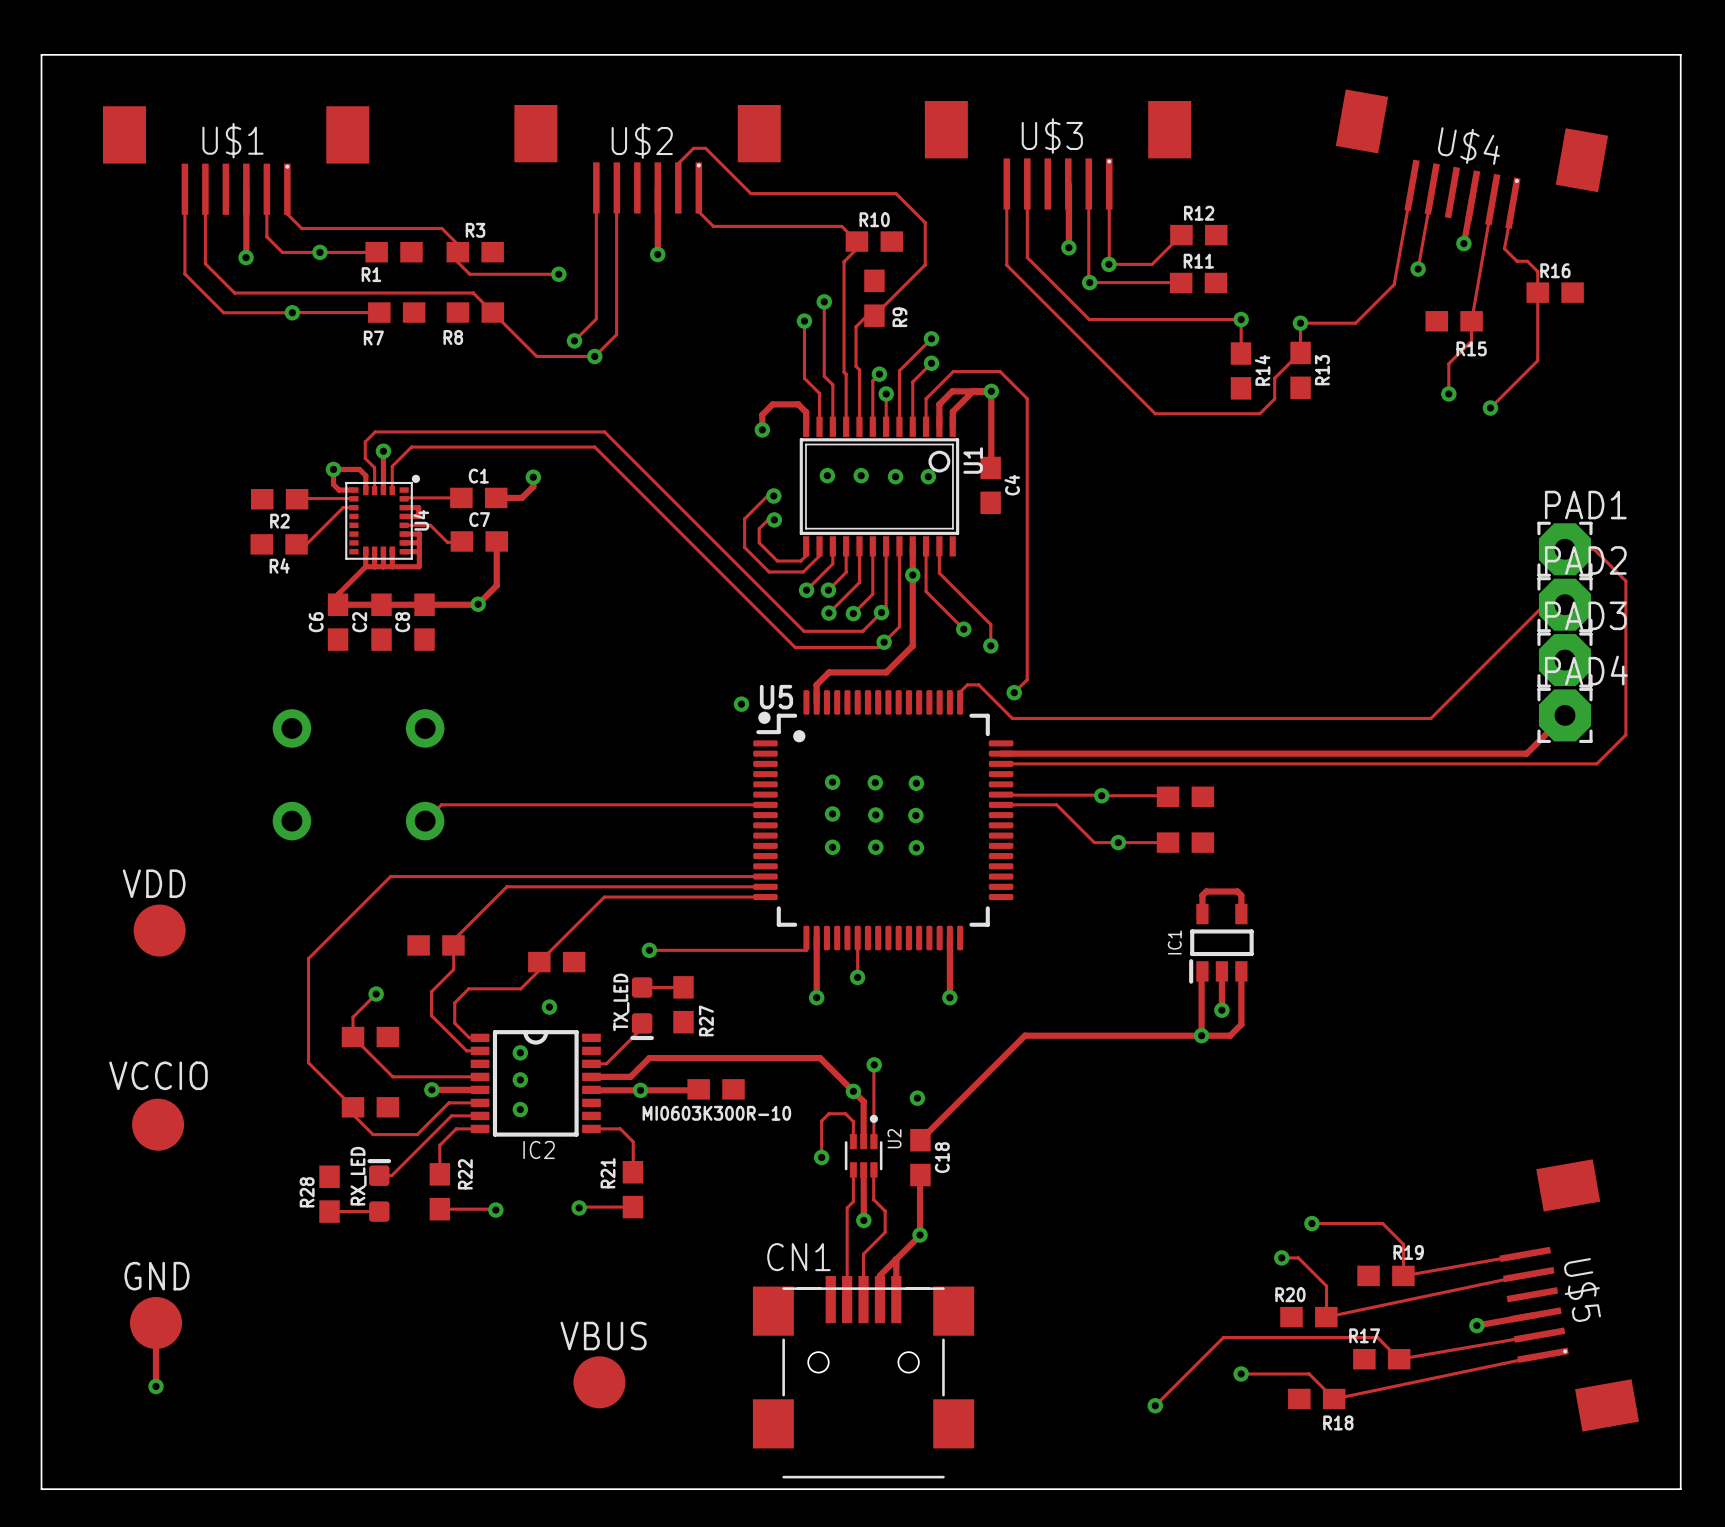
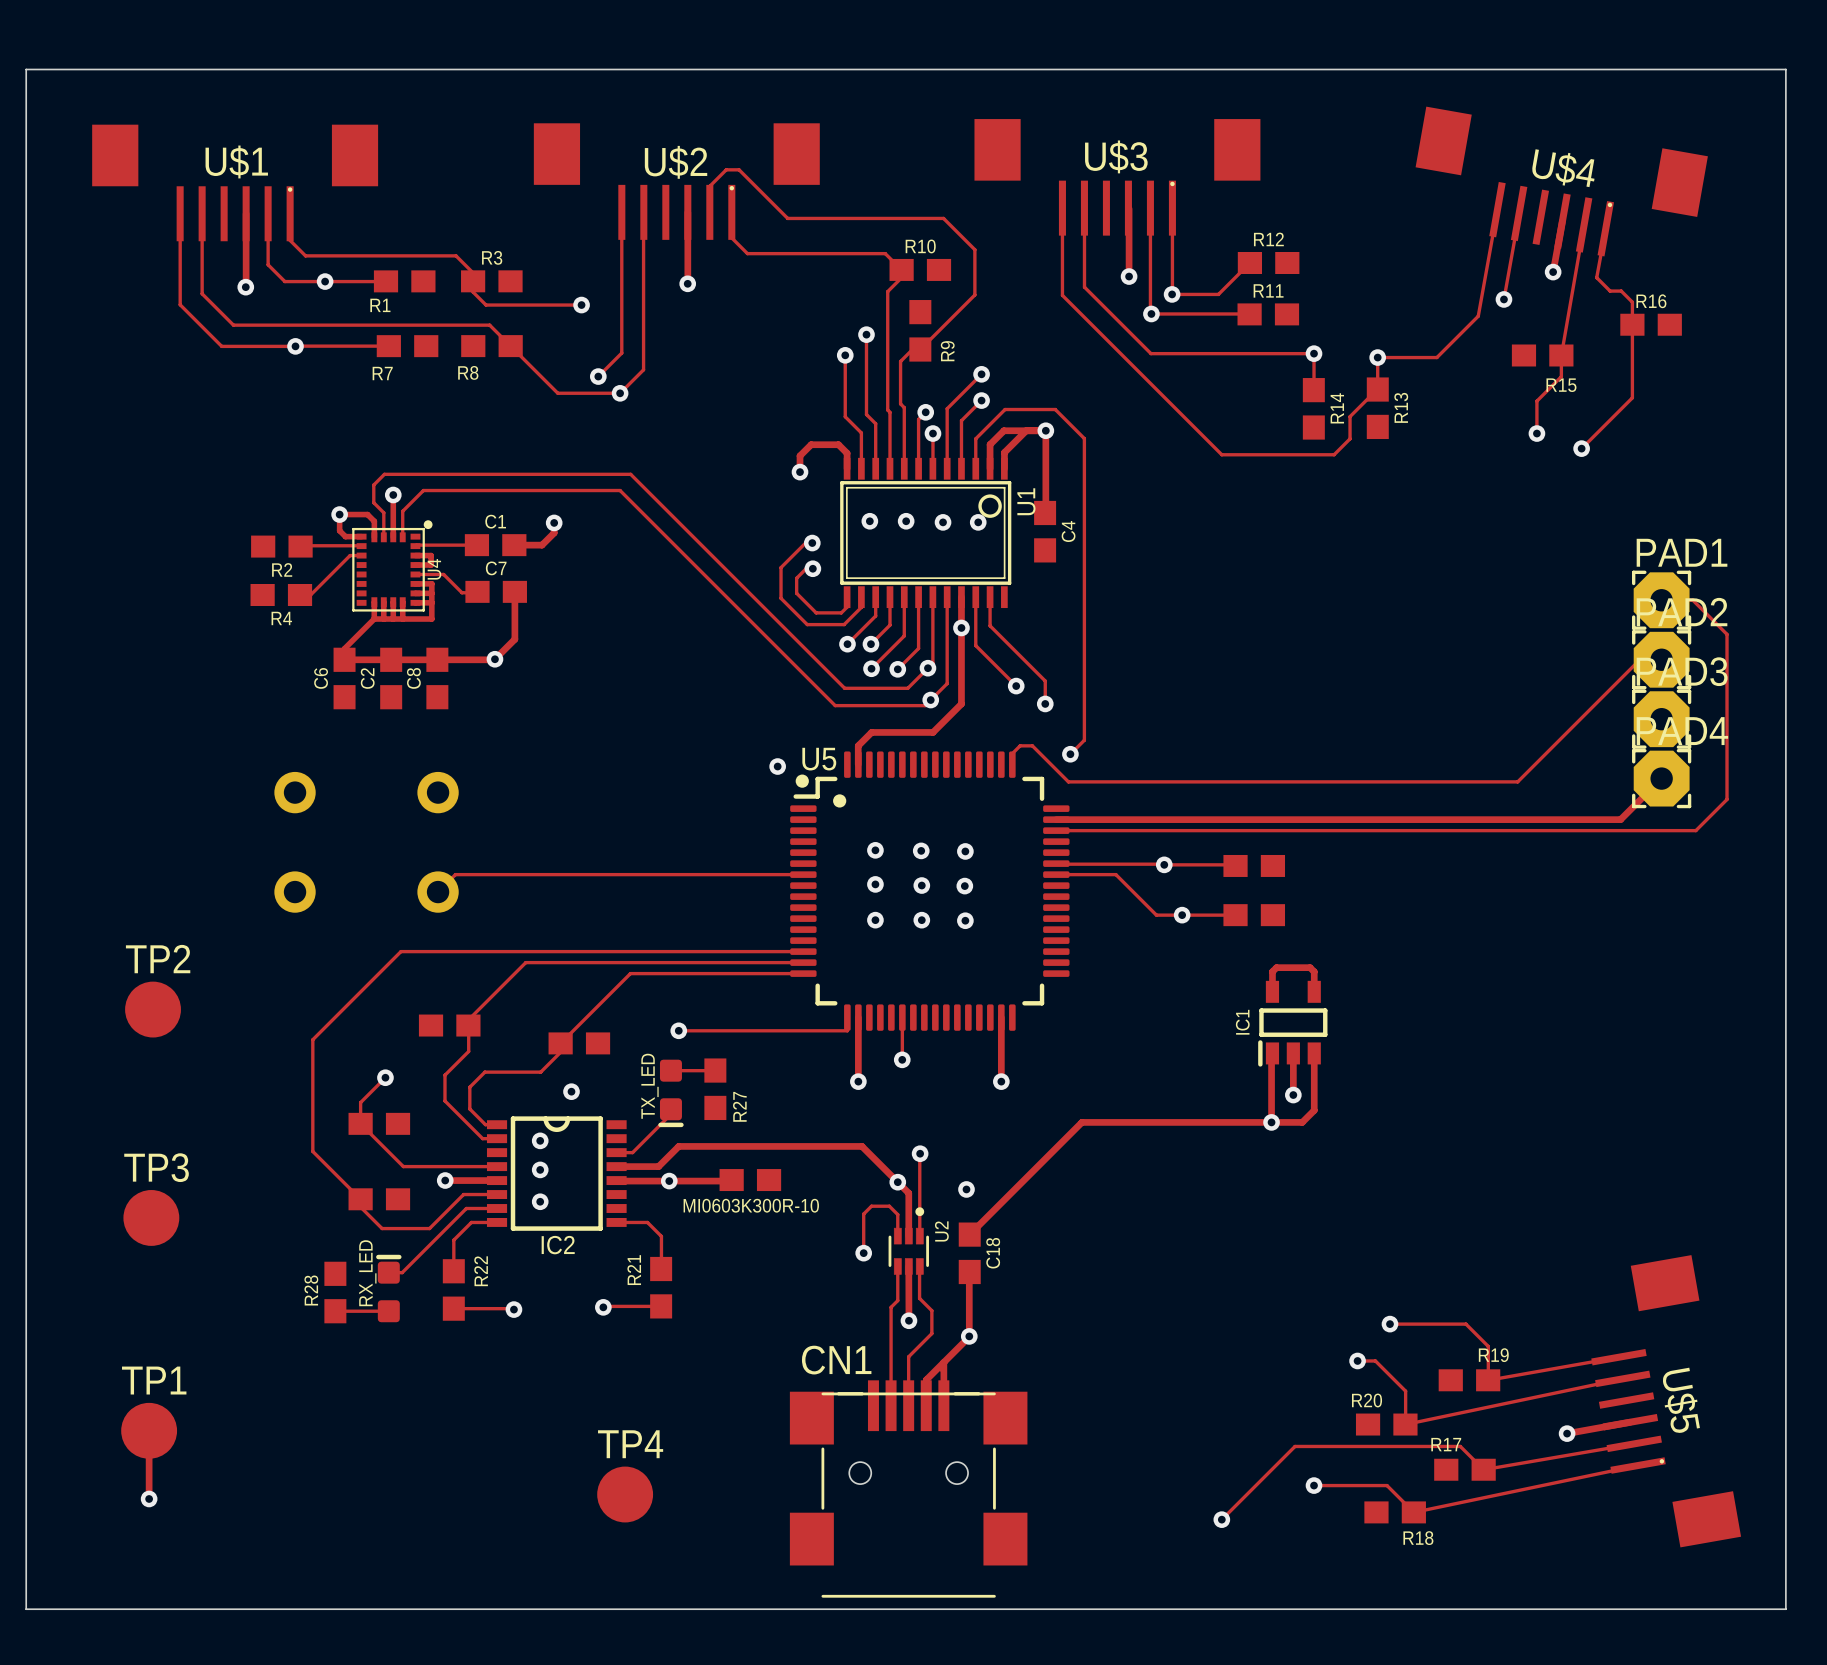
VDD name: VDD (154, 883) -> TP2 (158, 959)
VCCIO name: VCCIO (158, 1075) -> TP3 (156, 1167)
GND name: GND (156, 1276) -> TP1 (154, 1380)
VBUS name: VBUS (603, 1335) -> TP4 (630, 1444)

